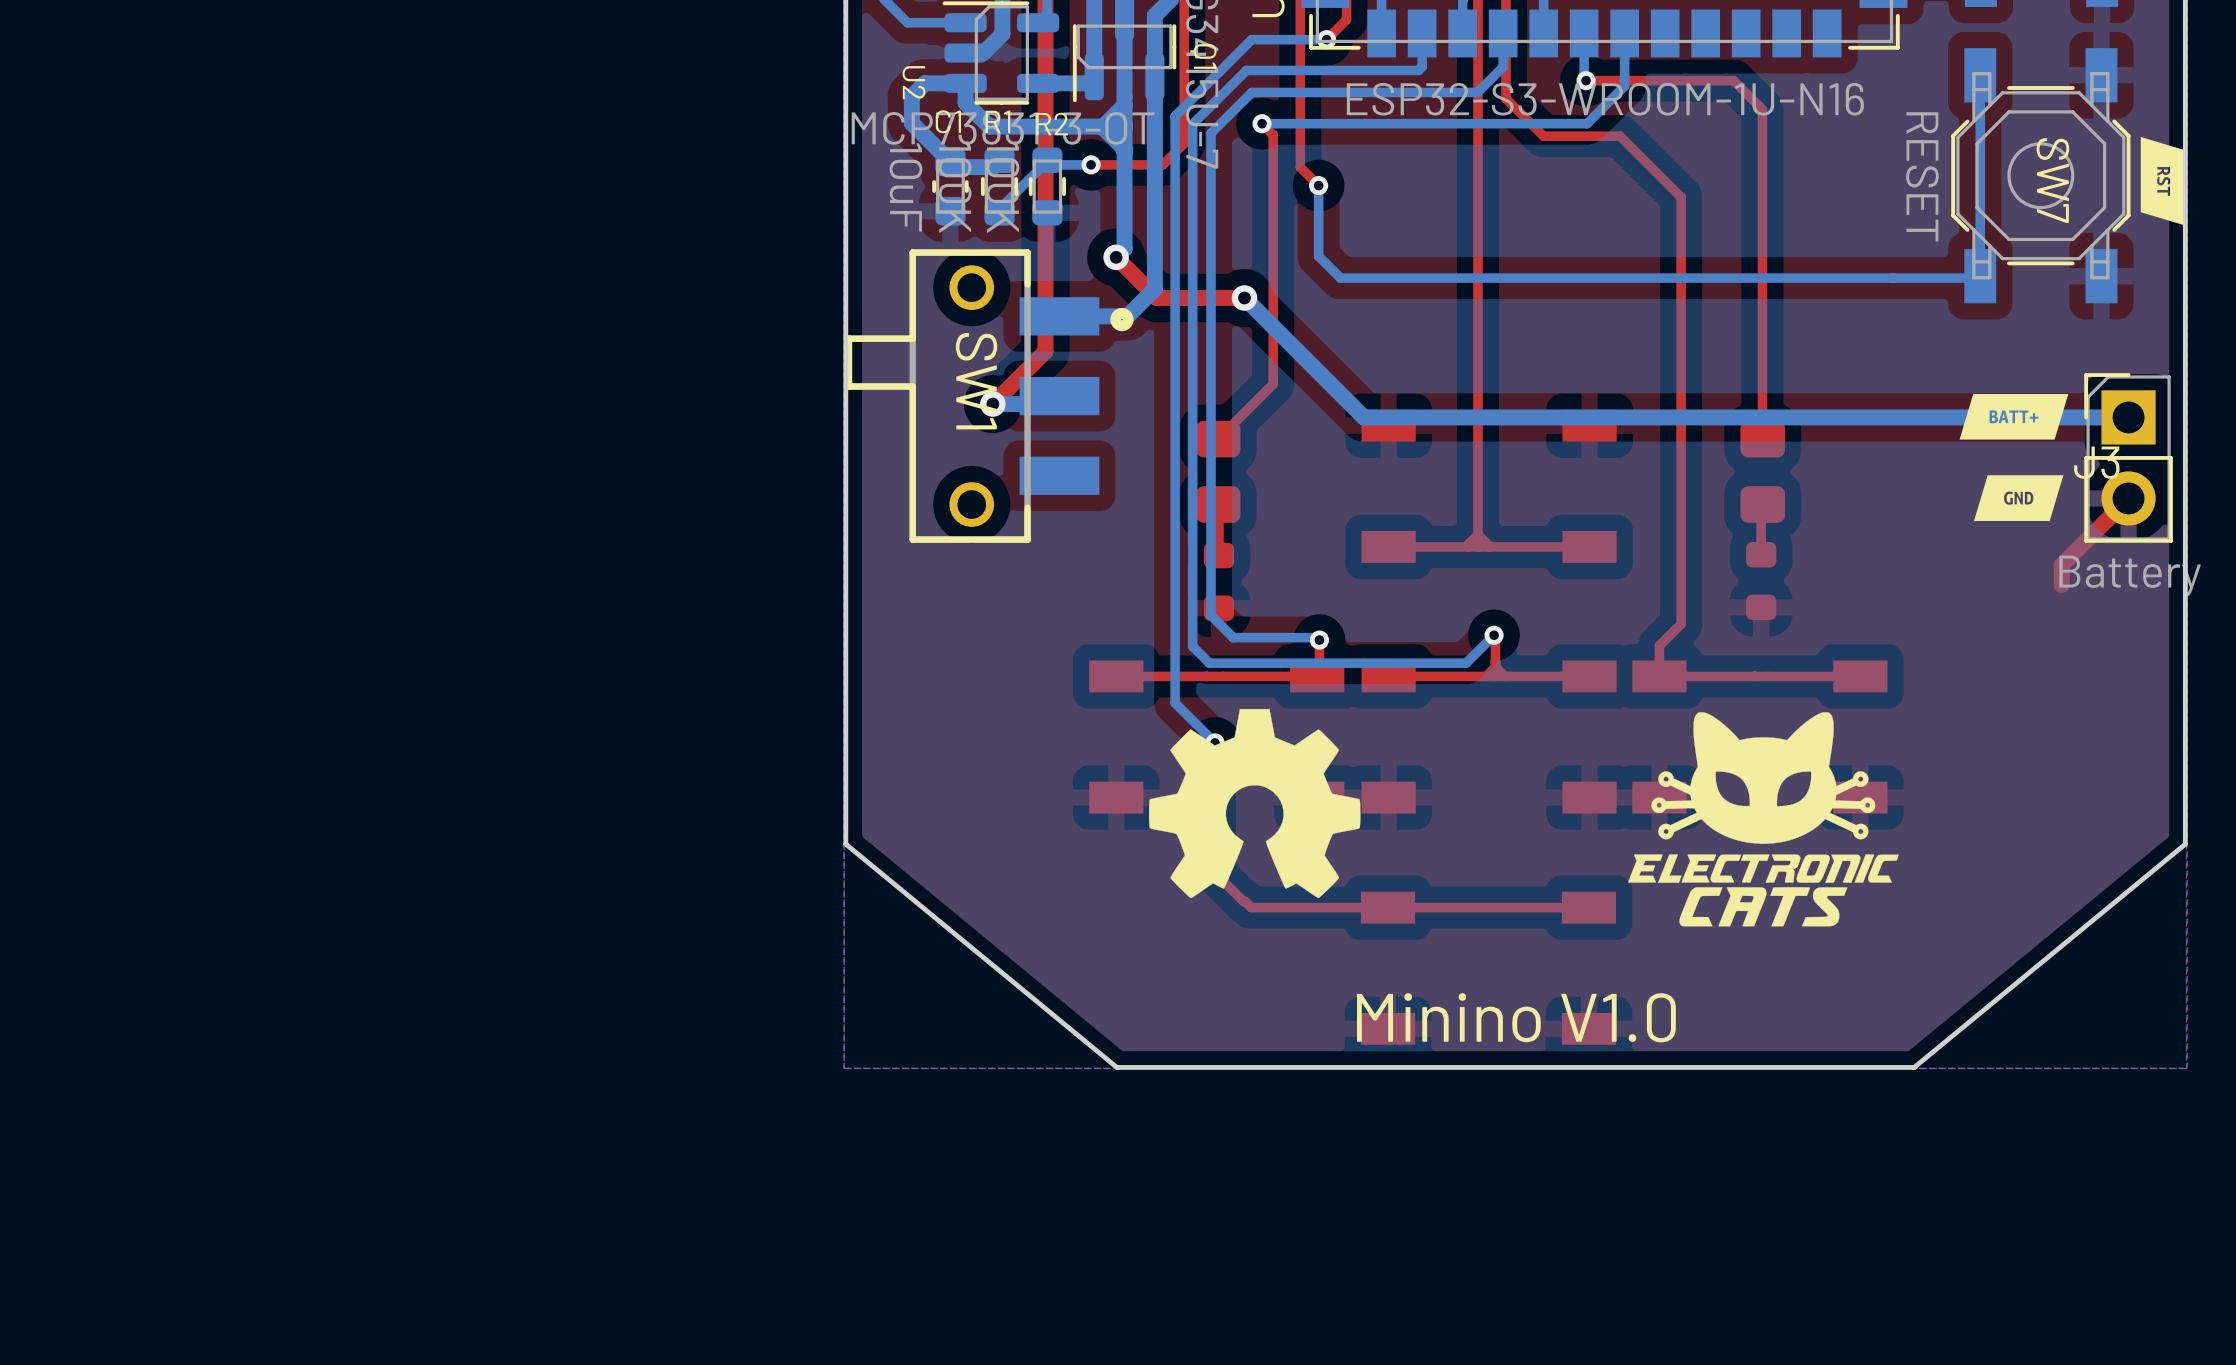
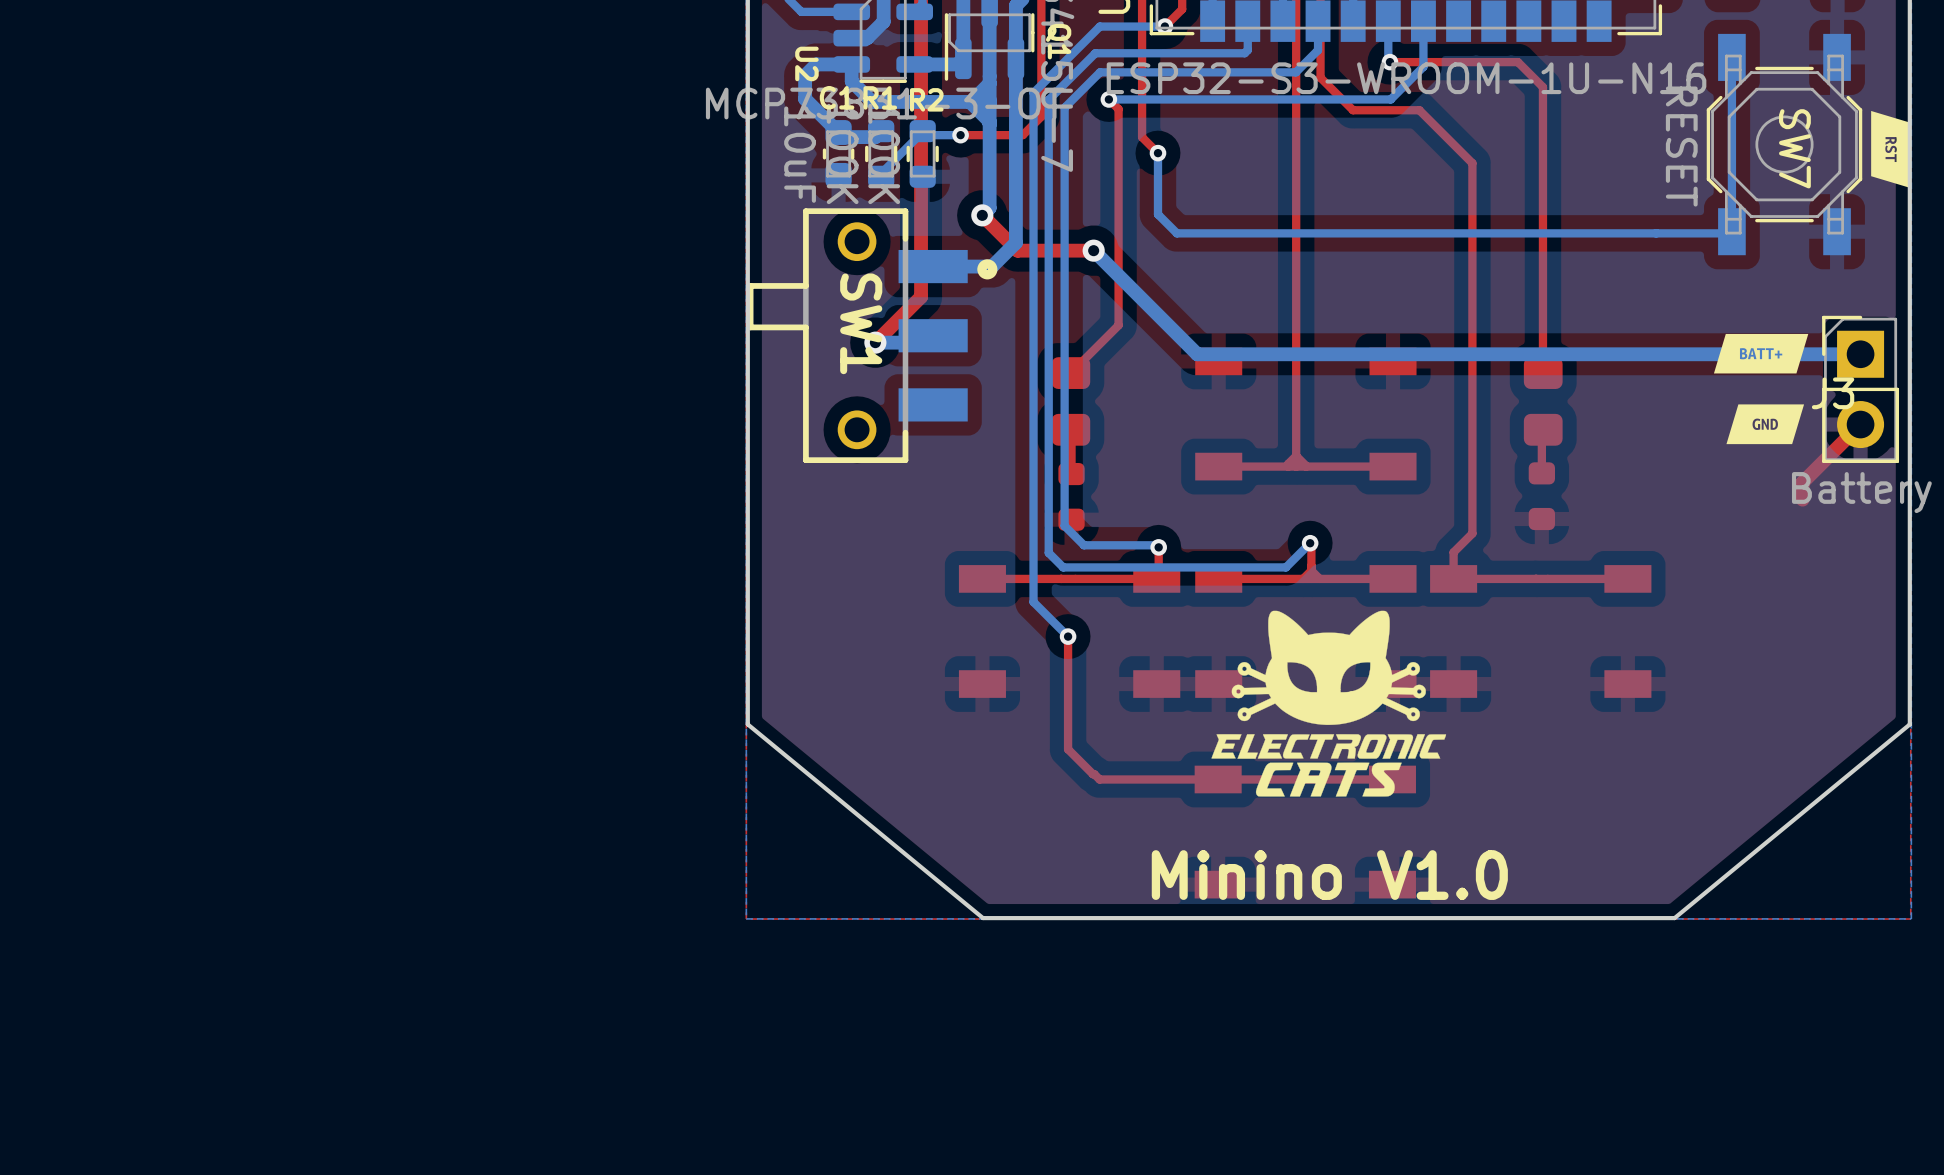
drawing: [1148, 708, 1361, 899] -> none
drawing position: (1763, 819) -> (1328, 703)

